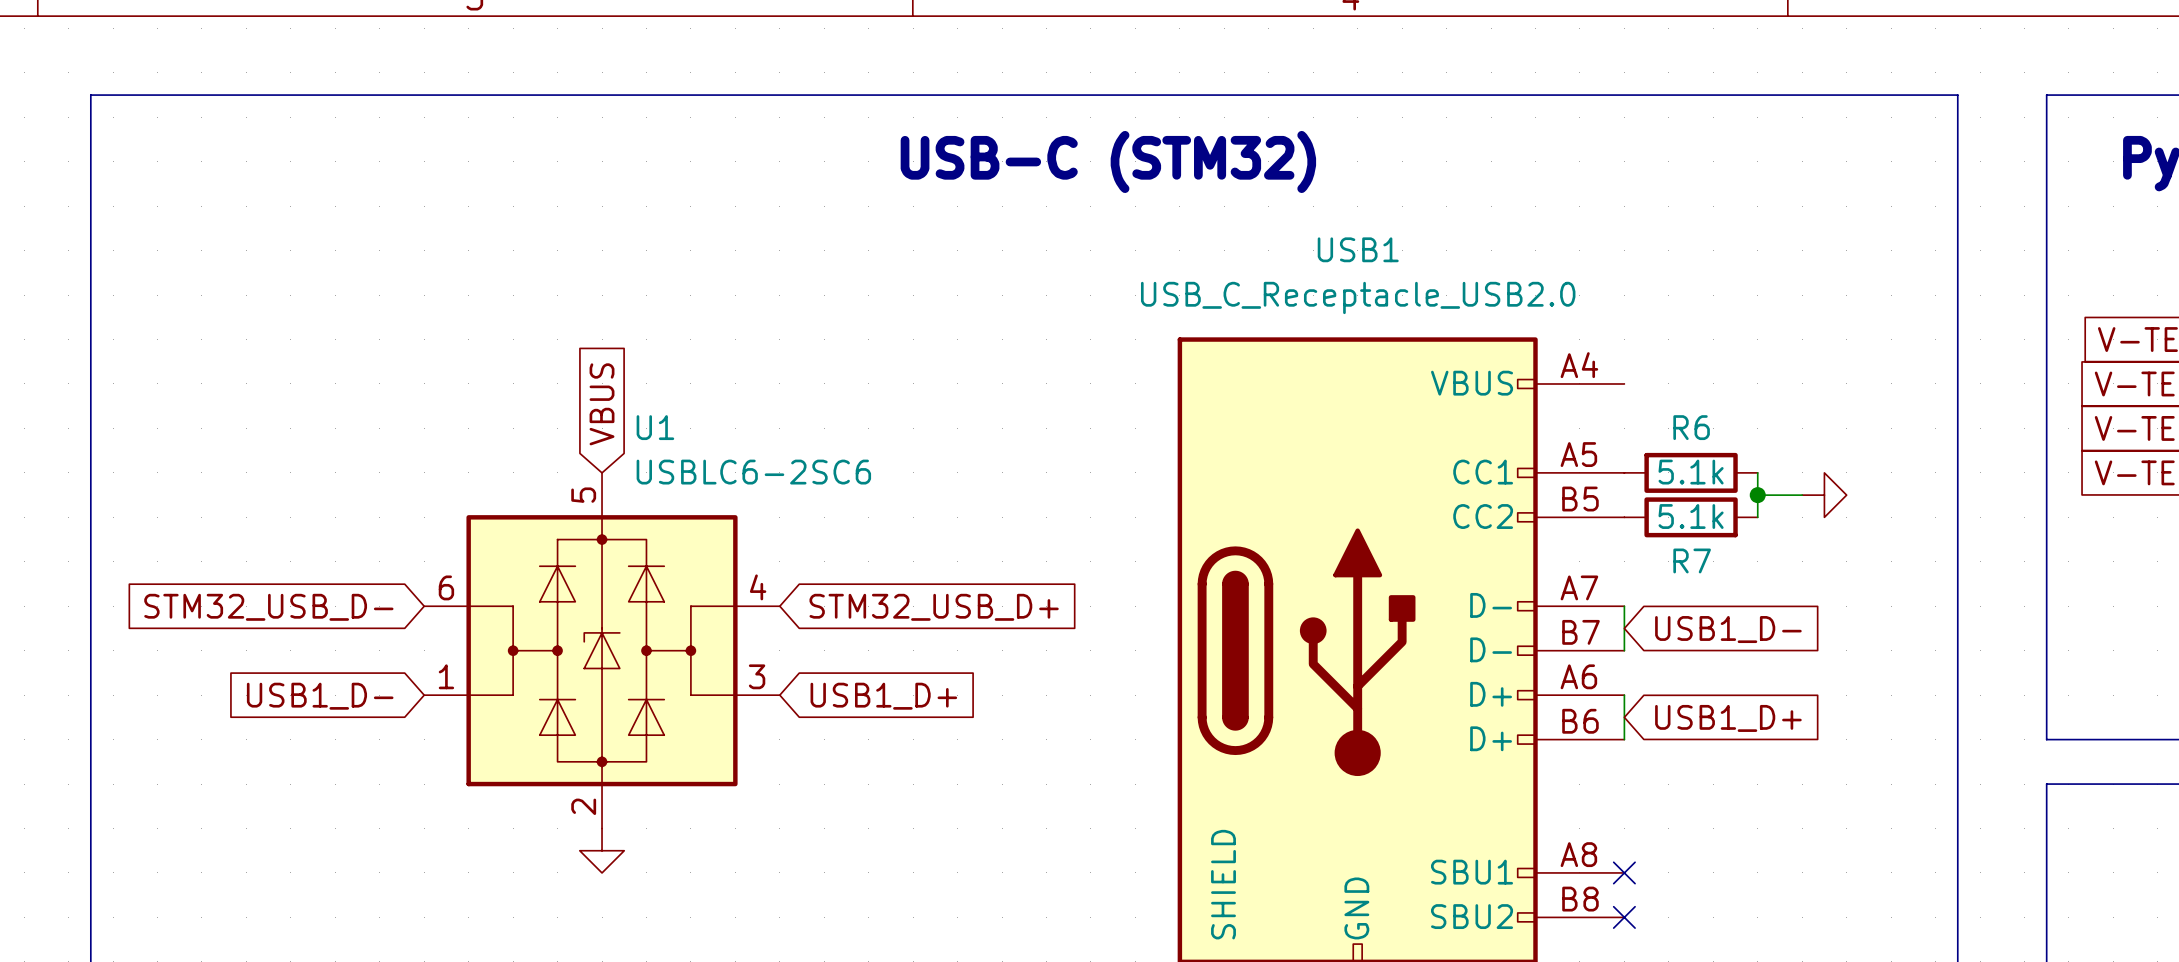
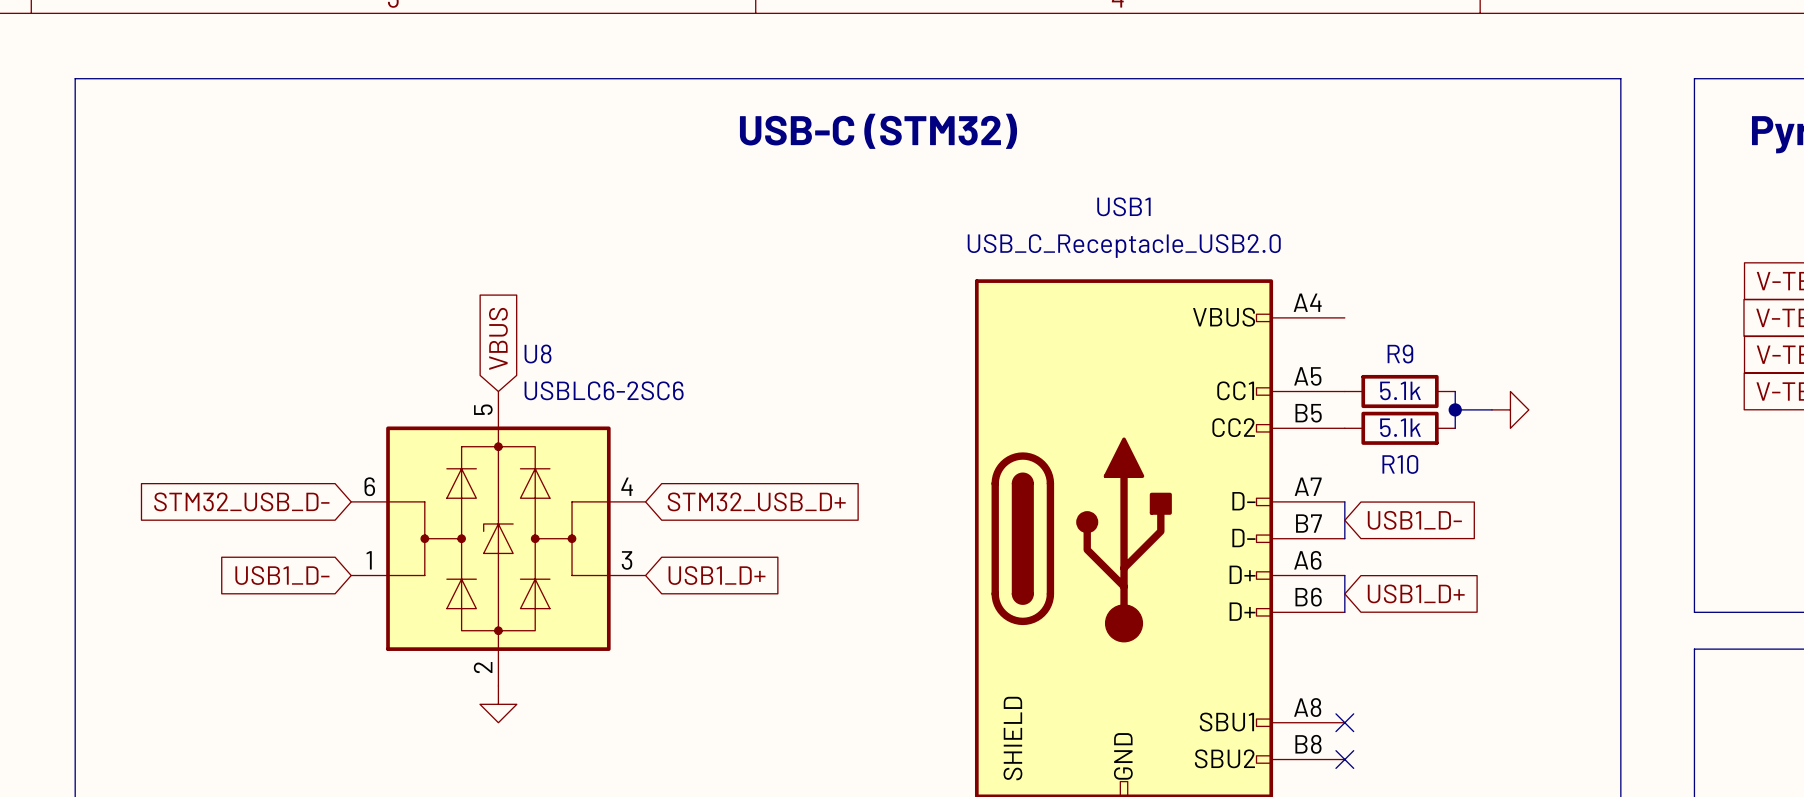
U1 name: U1 (655, 427) -> U8 (538, 353)
R6 name: R6 (1691, 427) -> R9 (1400, 354)
R7 name: R7 (1692, 560) -> R10 (1400, 464)

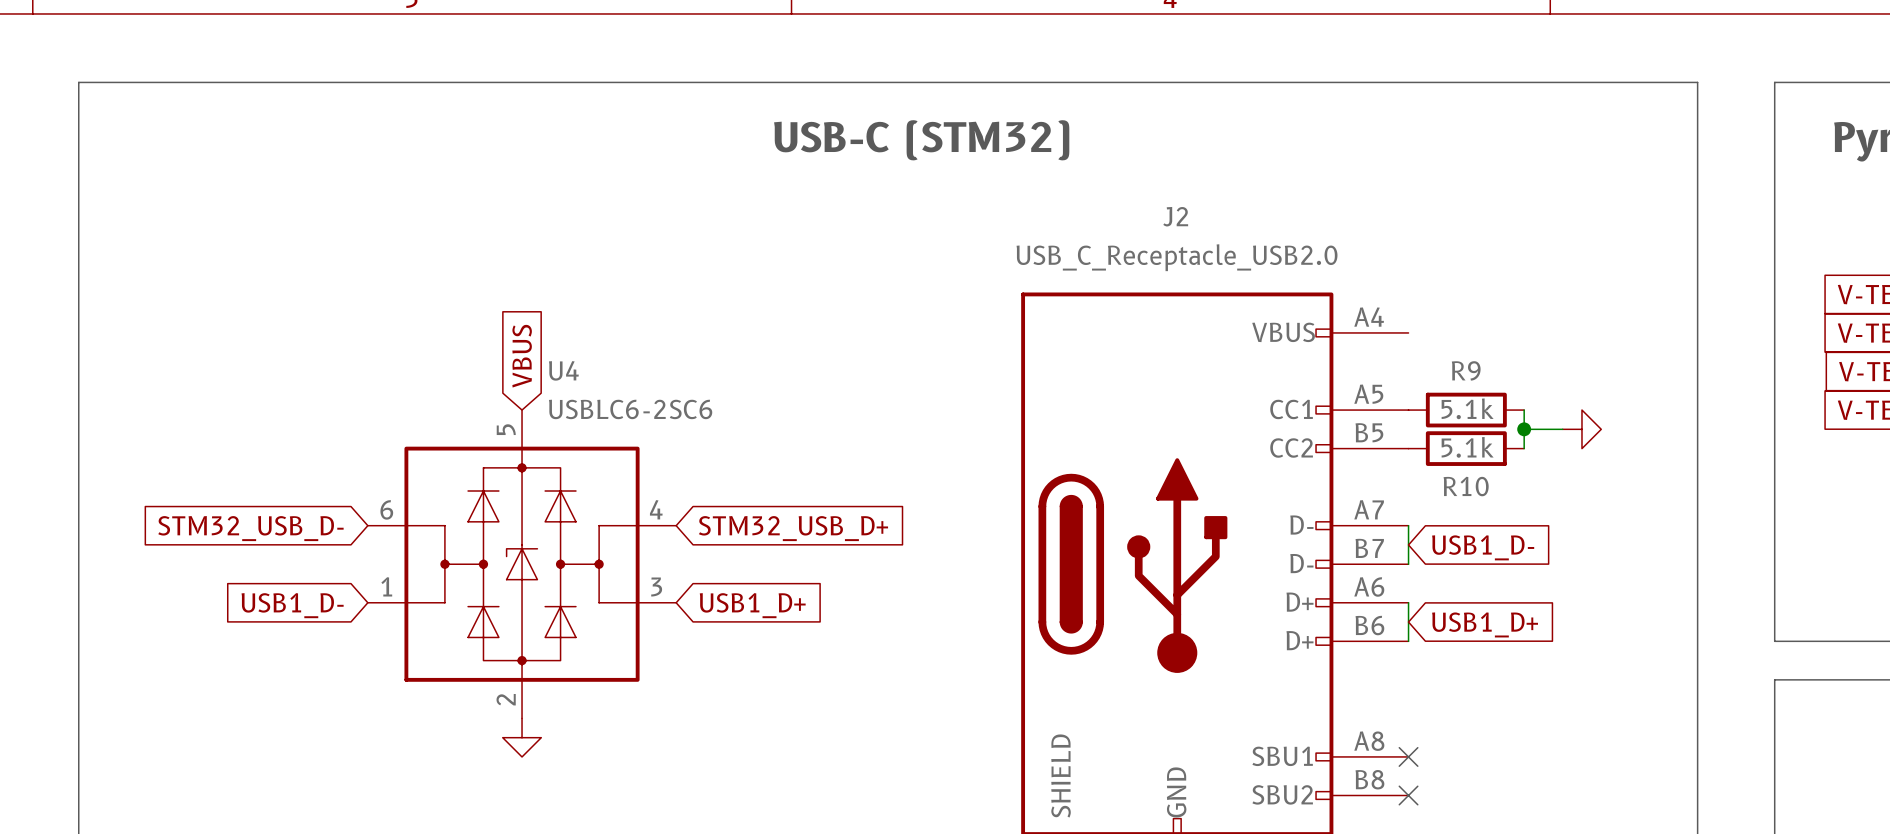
USB1 name: USB1 (1123, 206) -> J2 (1175, 216)
U8 name: U8 (538, 353) -> U4 (563, 370)

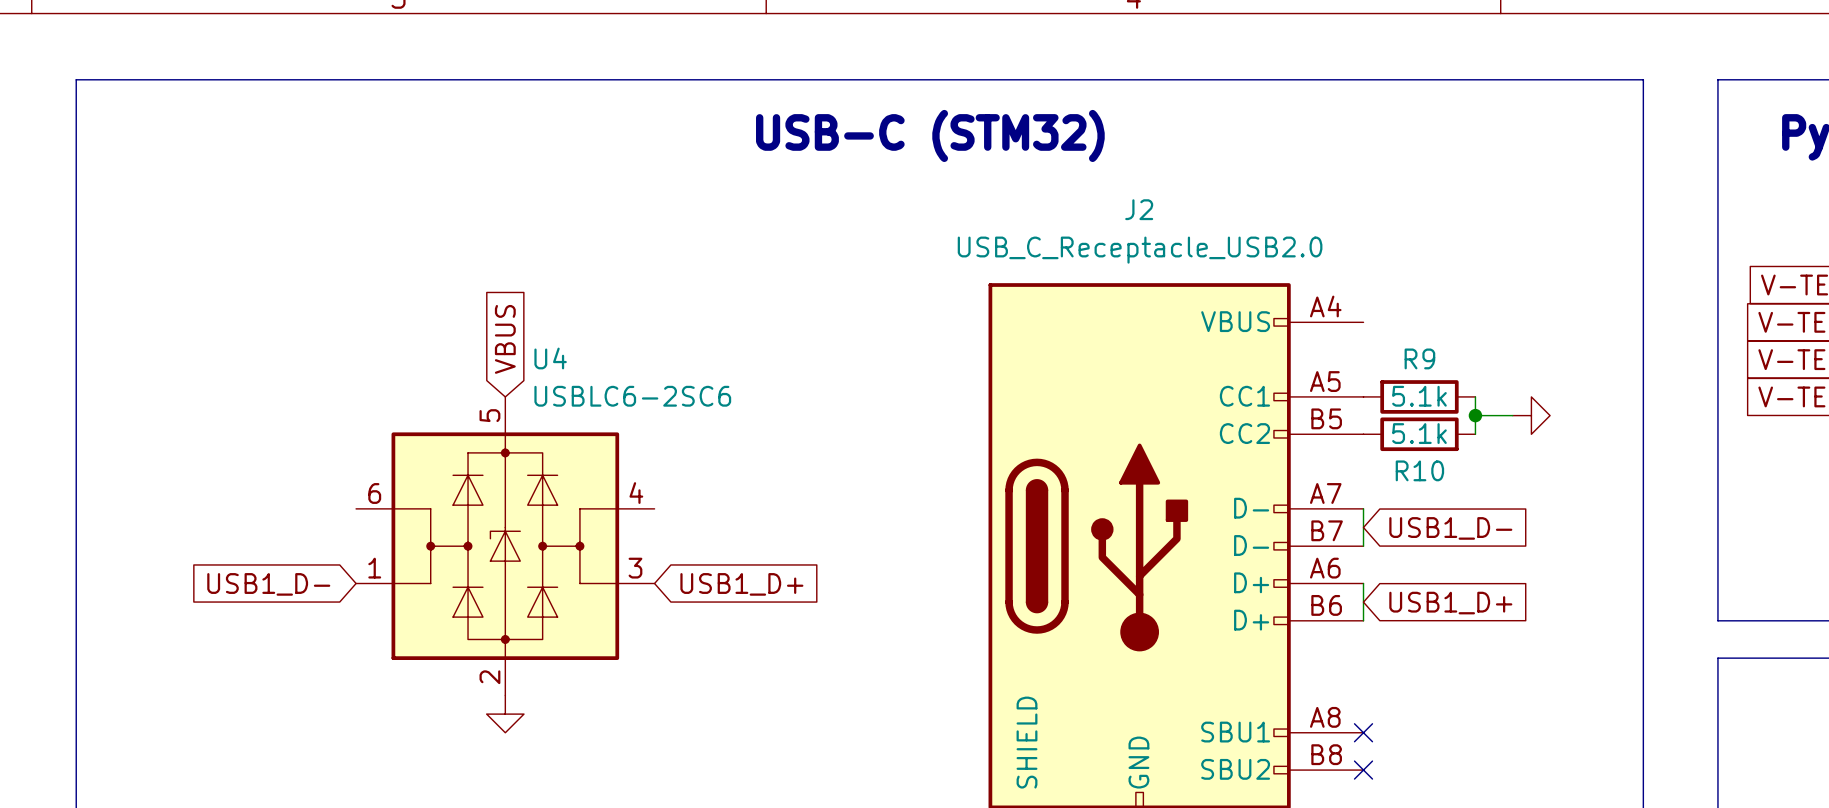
global label: STM32_USB_D- (250, 528) -> none
global label: STM32_USB_D+ (793, 528) -> none

